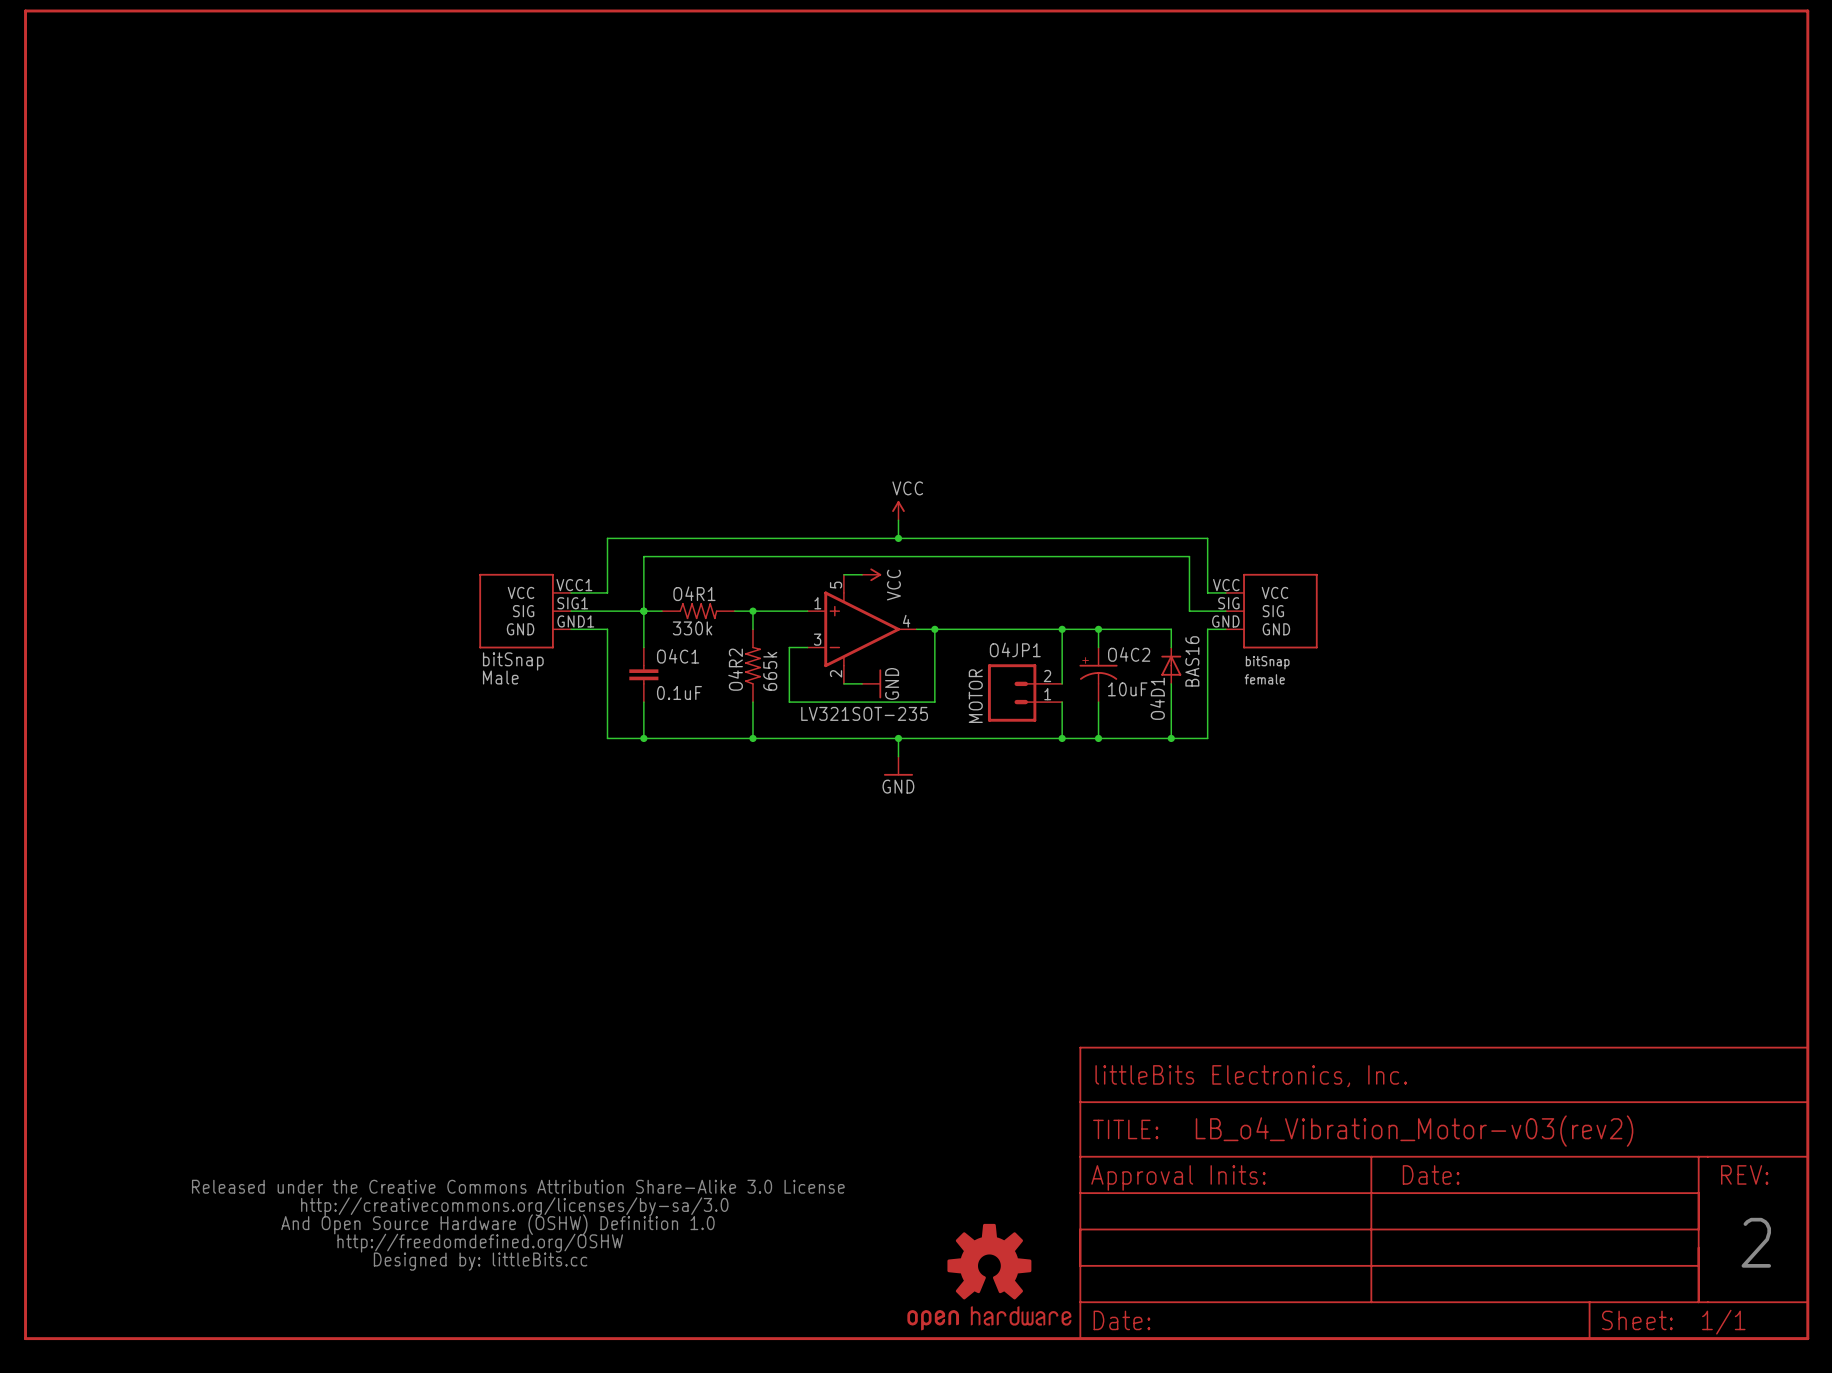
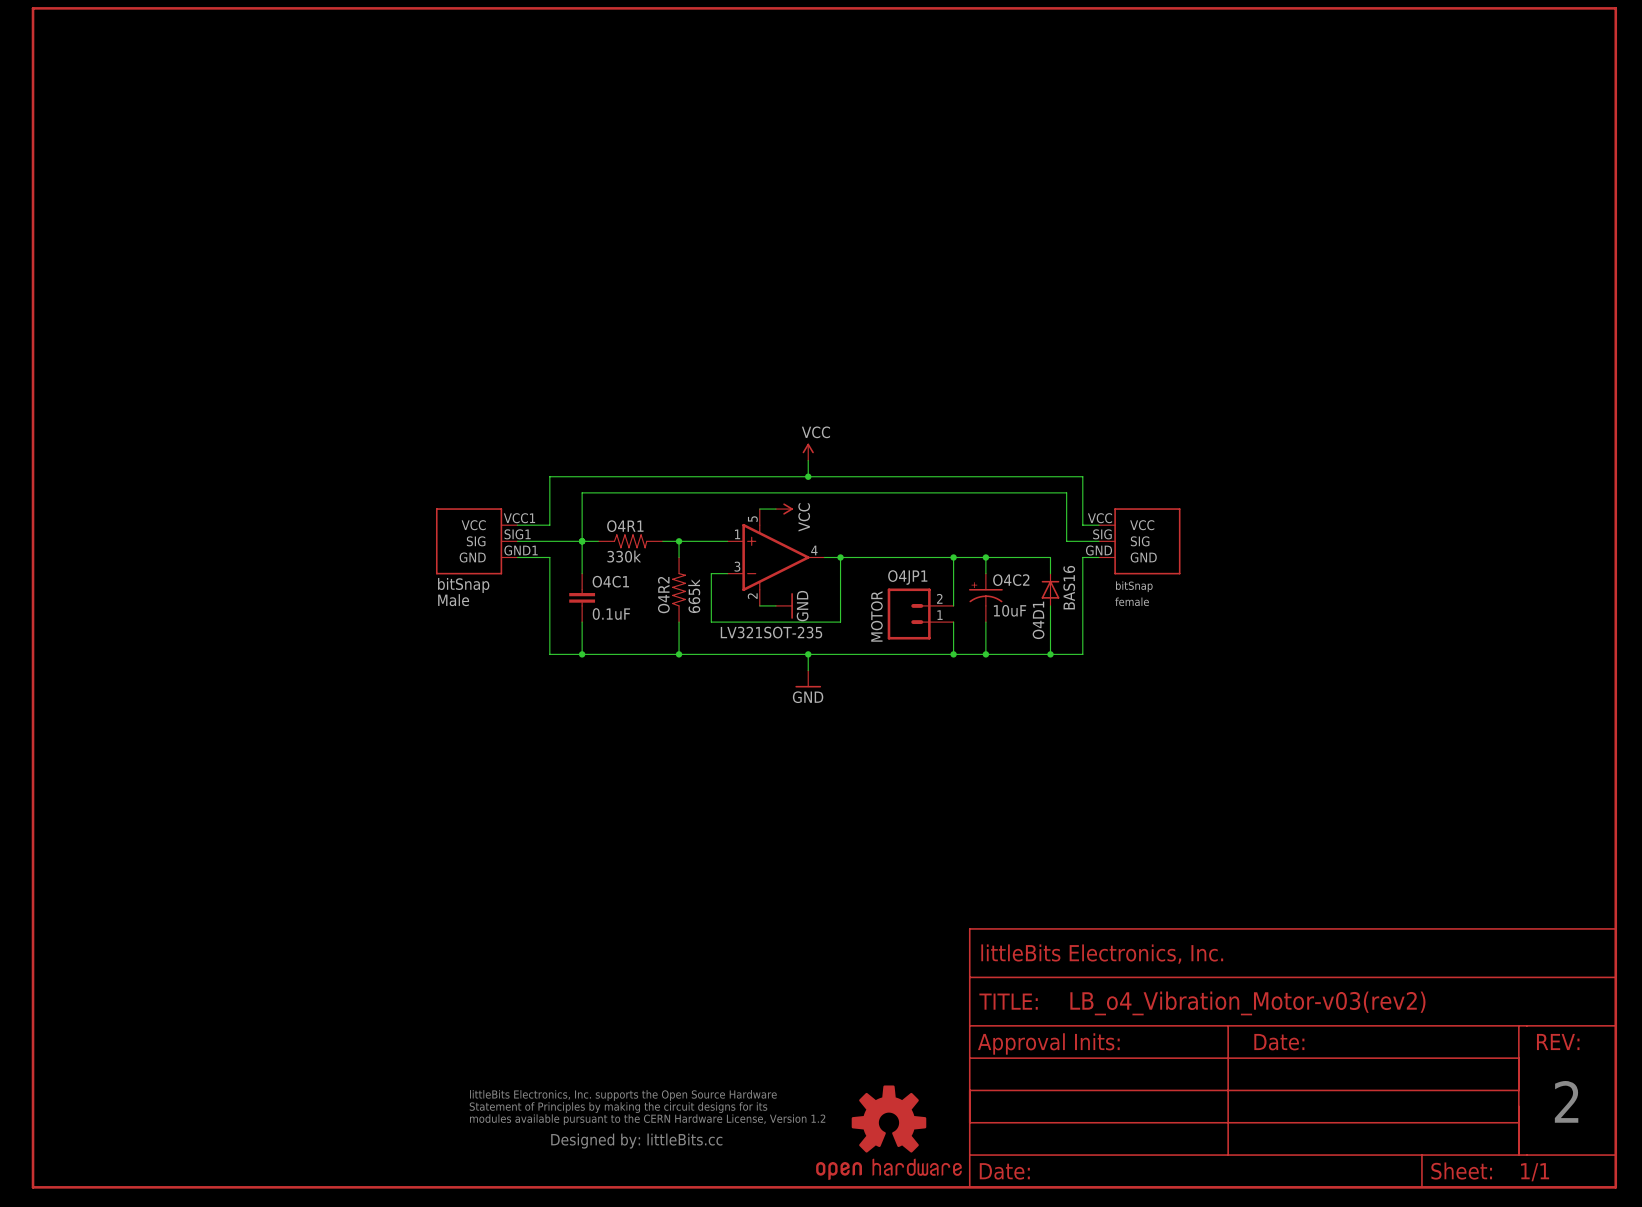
part: (518, 1225) -> none
part: none -> (647, 1119)

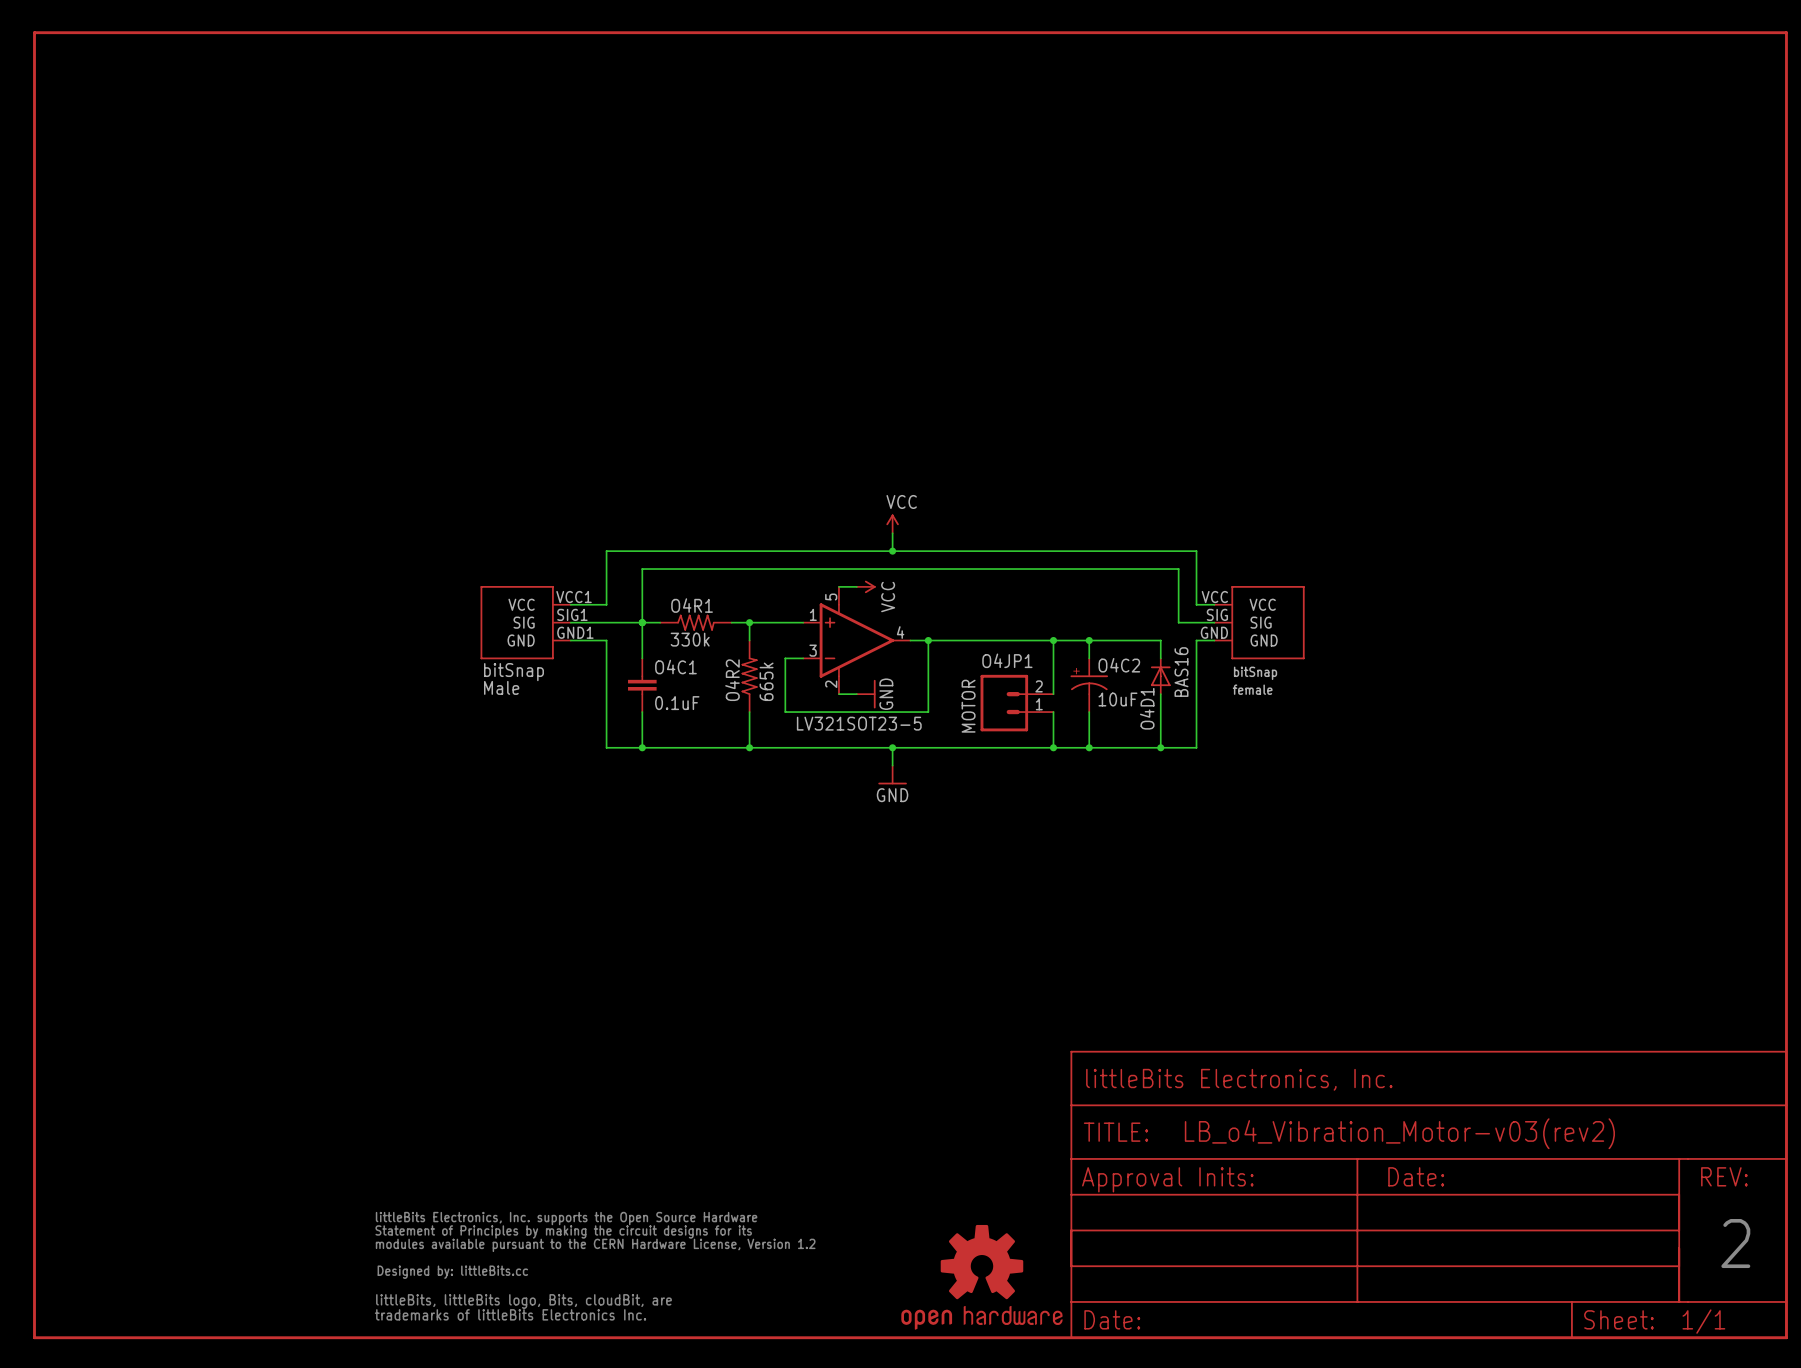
part value: LV321SOT-235 (771, 632) -> LV321SOT23-5 (859, 723)
part: (647, 1119) -> none
part: none -> (595, 1266)

